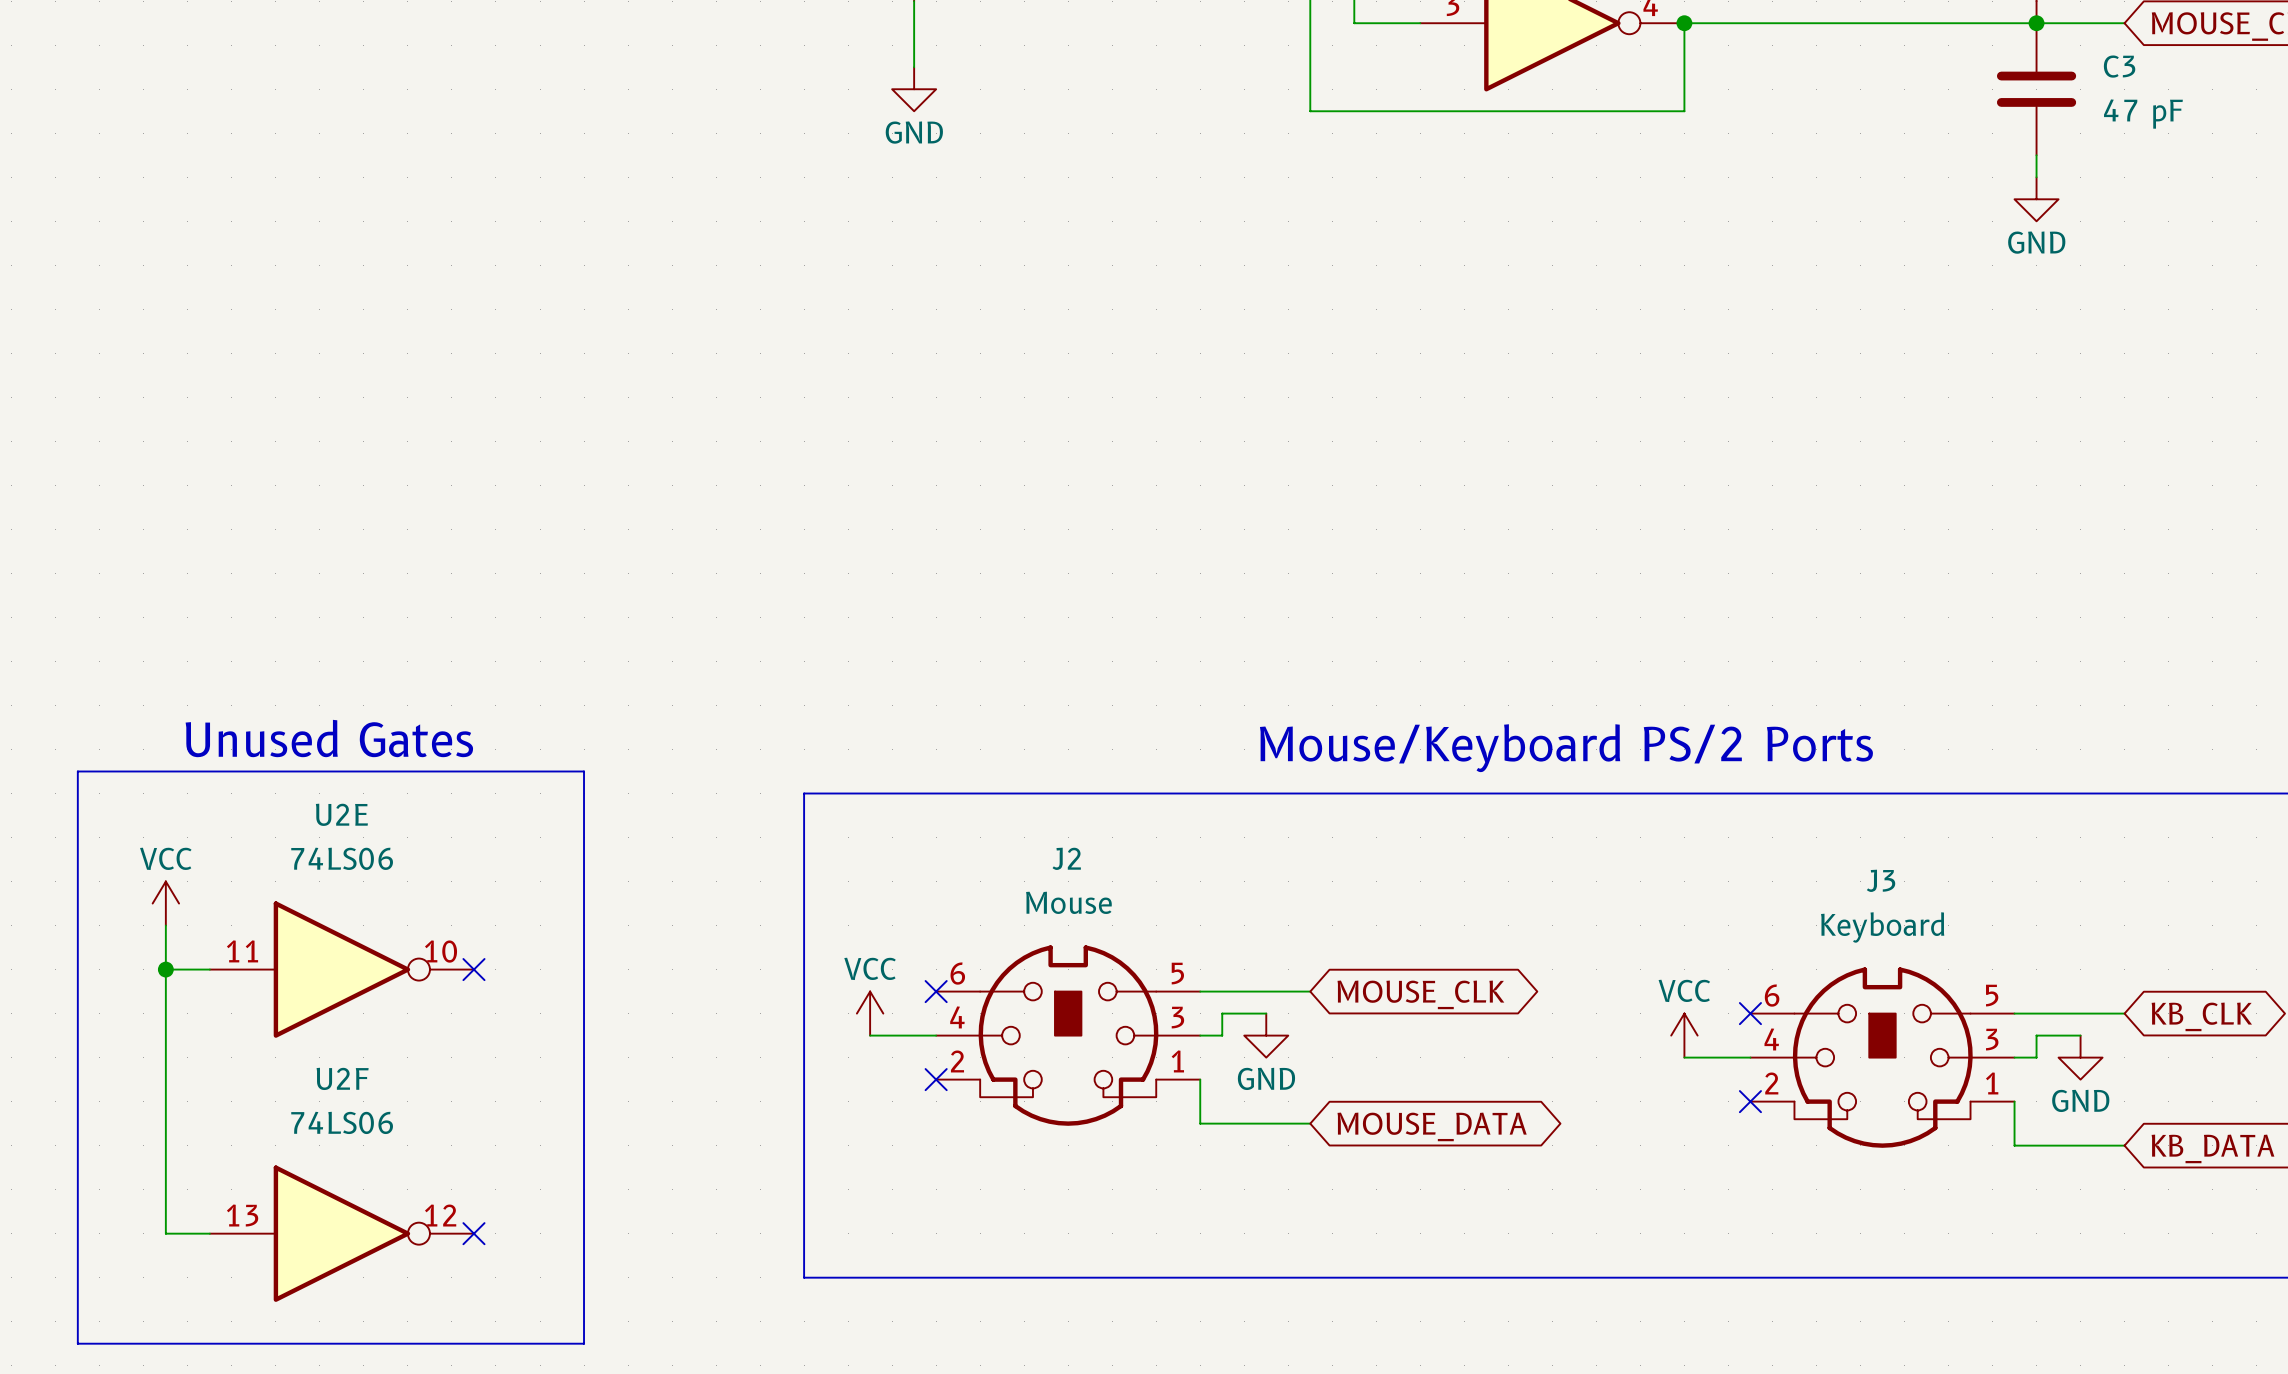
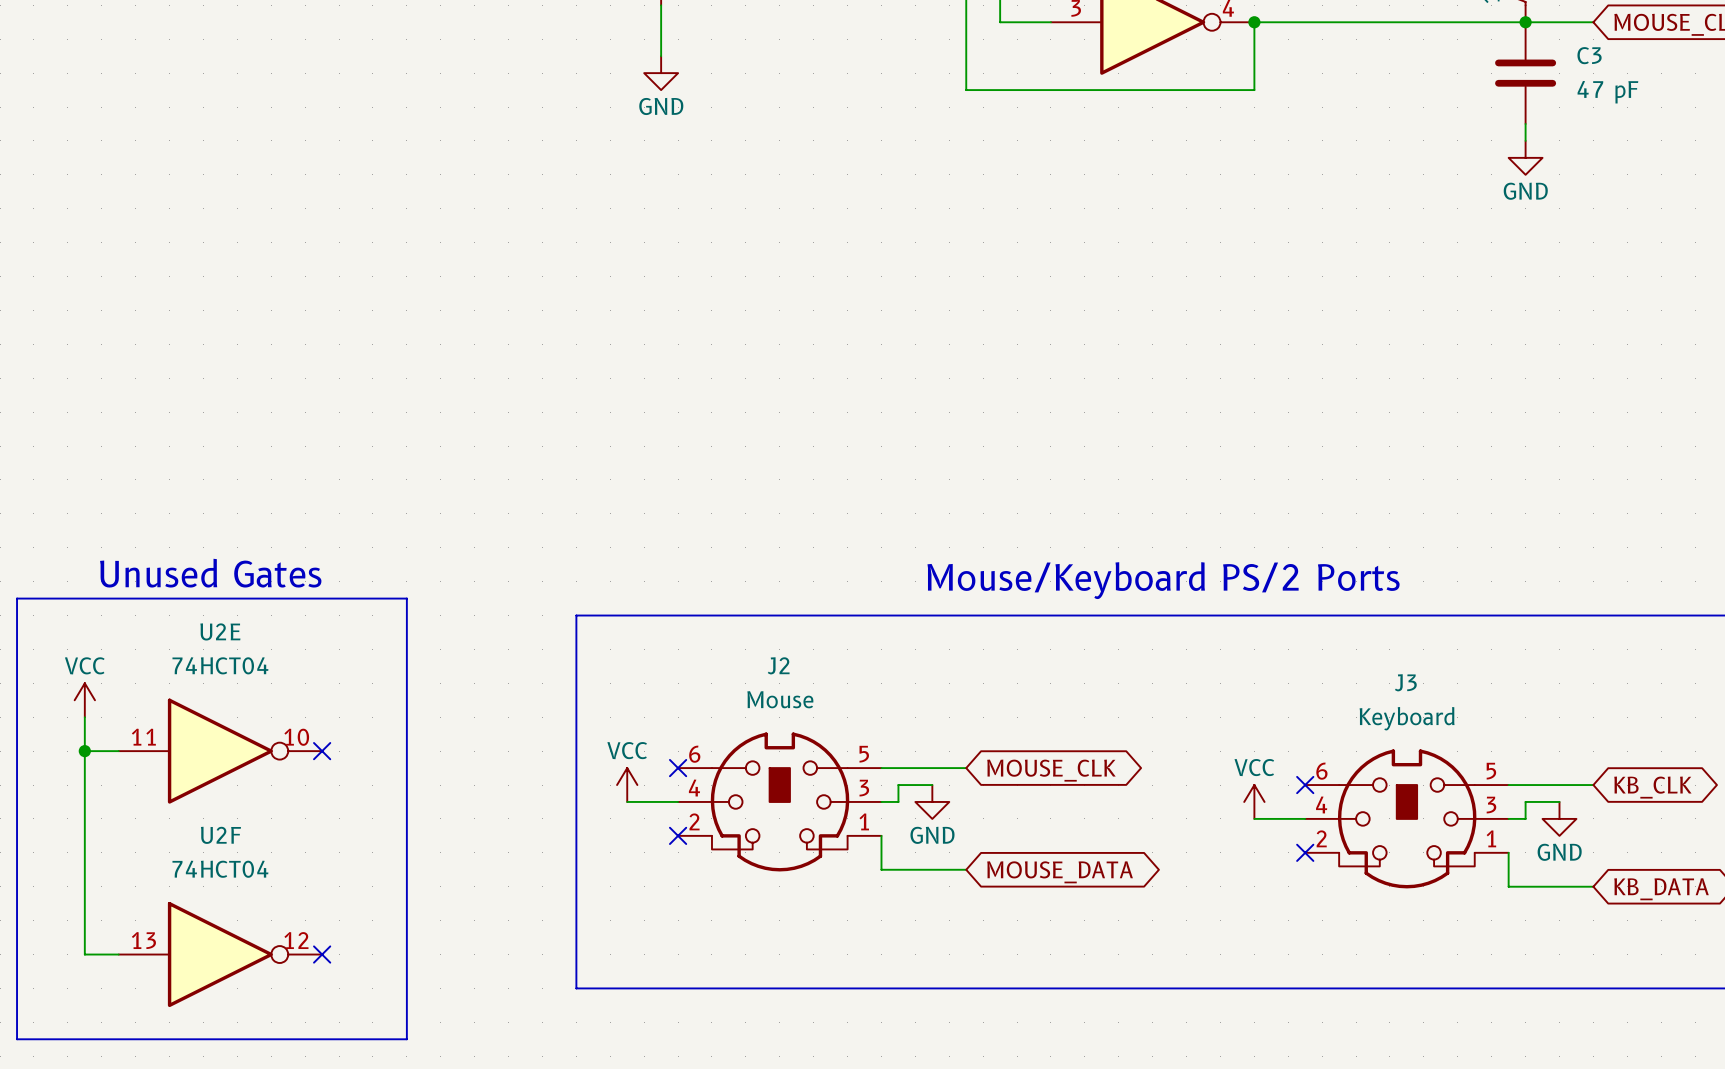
U2E value: 74LS06 (342, 858) -> 74HCT04 (220, 665)
U2F value: 74LS06 (342, 1122) -> 74HCT04 (220, 869)

